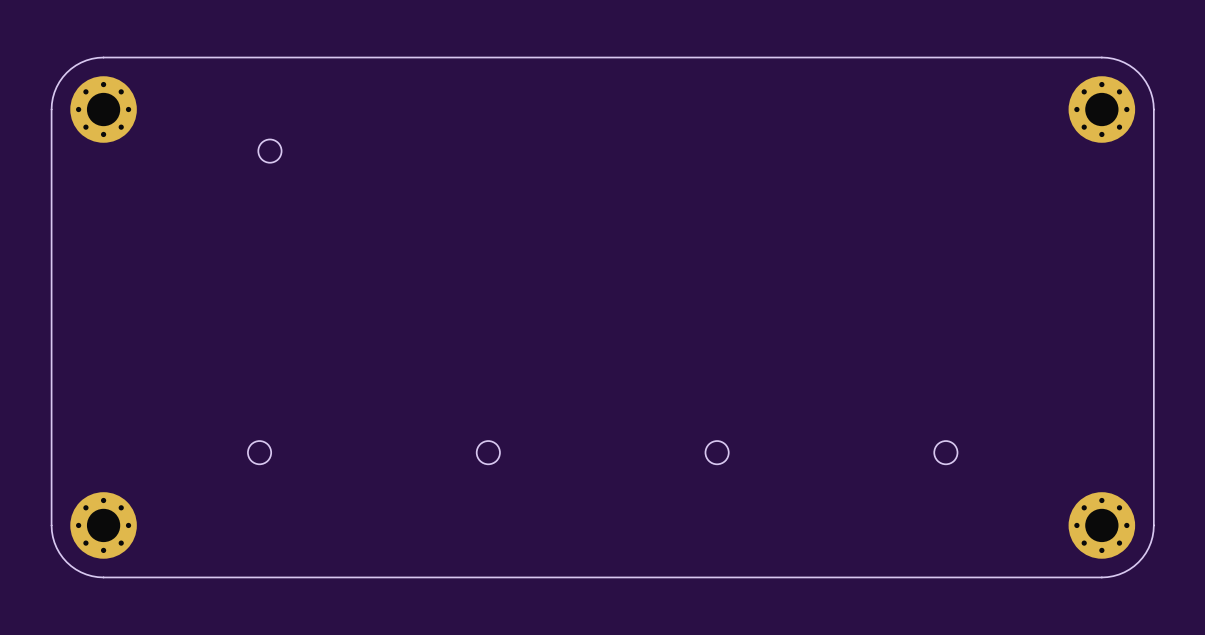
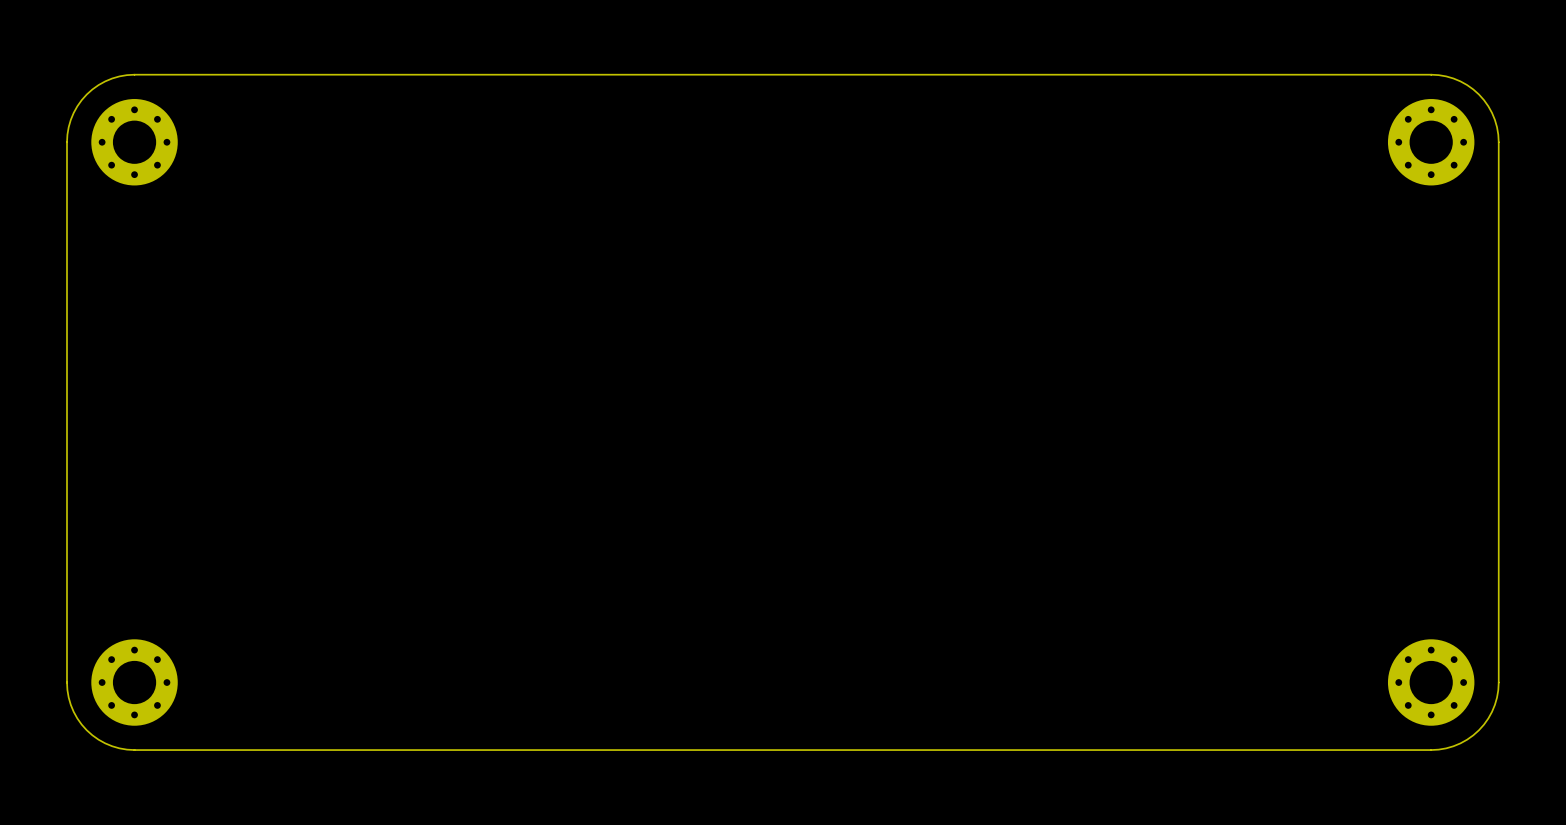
round board edge: [257, 138, 283, 164] -> none
round board edge: [247, 440, 272, 465] -> none
round board edge: [476, 440, 501, 465] -> none
round board edge: [704, 440, 730, 465] -> none
round board edge: [933, 440, 959, 465] -> none

